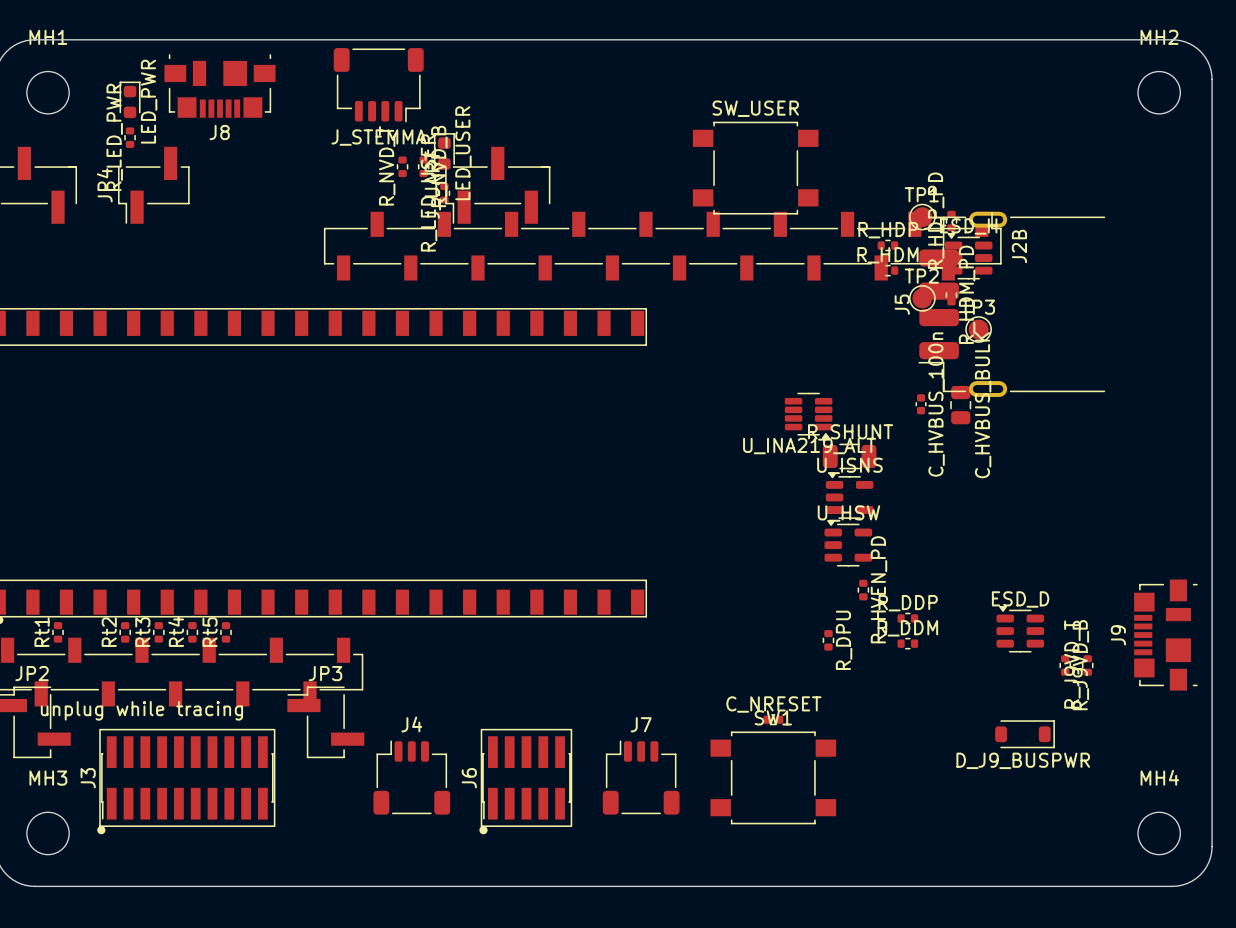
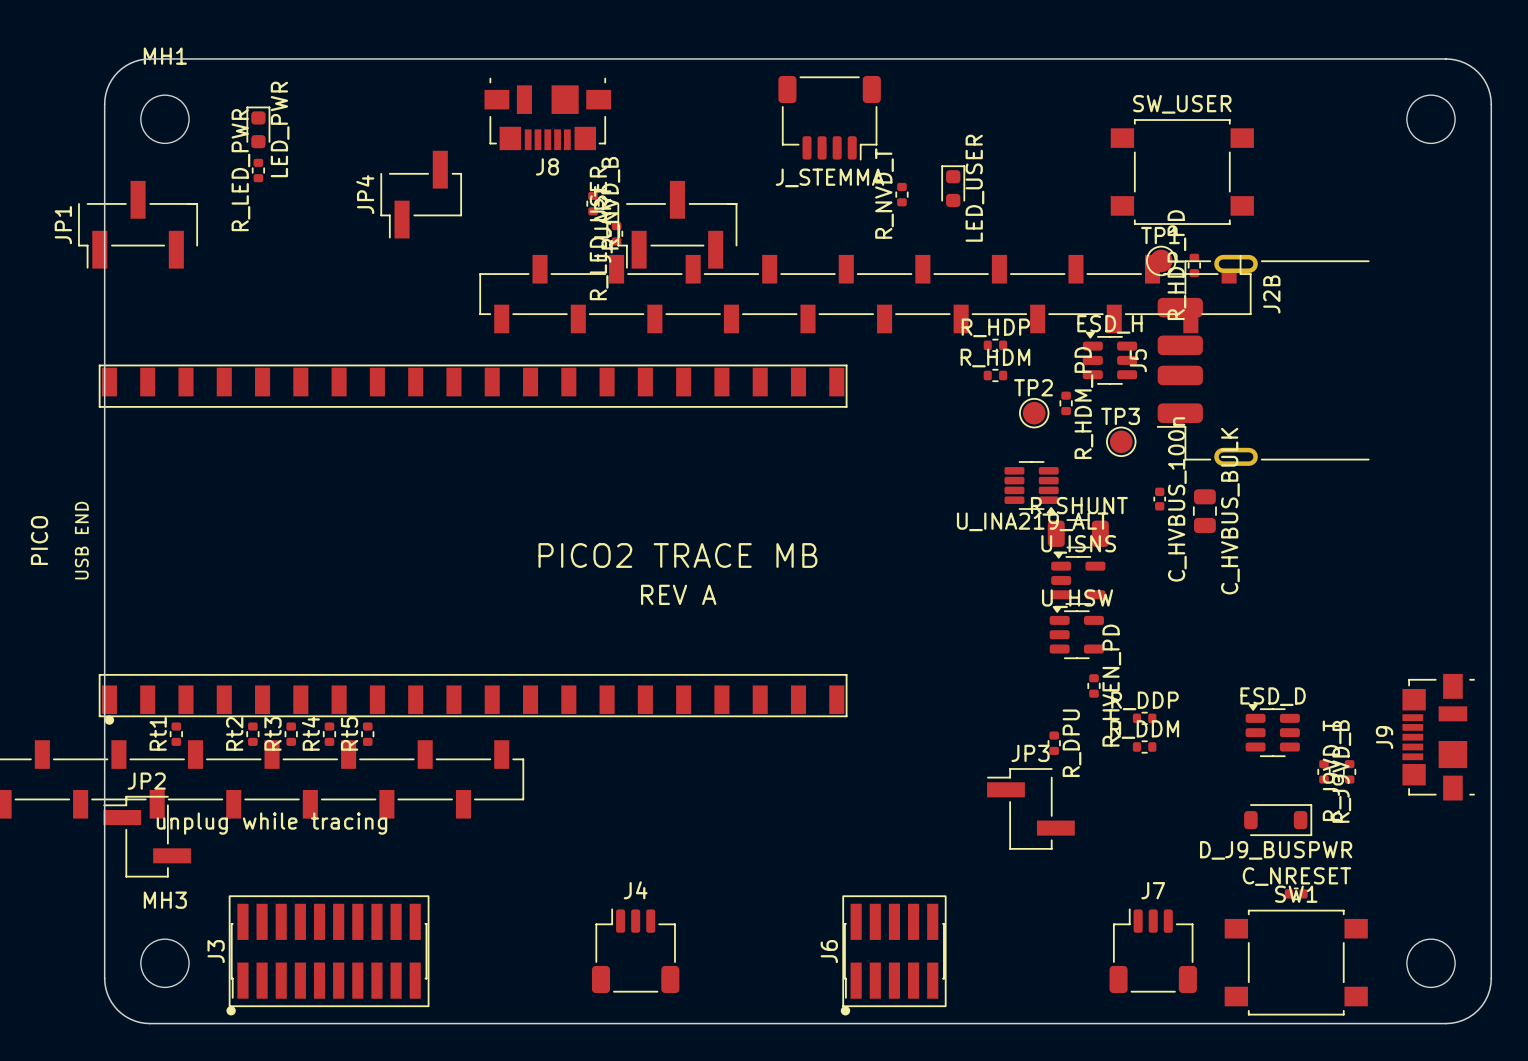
MH2 name: MH2 (1159, 37) -> none
J8 position: (219, 85) -> (547, 113)
J_STEMMA position: (378, 85) -> (829, 118)
LED_USER position: (444, 151) -> (953, 186)
R_NVD_T position: (402, 166) -> (901, 194)
SW_USER position: (755, 168) -> (1182, 172)
JP4 position: (153, 185) -> (421, 194)
R_HDP position: (887, 245) -> (995, 345)
ESD_H position: (968, 256) -> (1109, 358)
R_HDM position: (887, 270) -> (995, 375)
R_HDM_PD position: (951, 295) -> (1066, 403)
TP2 position: (922, 298) -> (1034, 413)
TP3 position: (978, 329) -> (1121, 441)
C_HVBUS_100n position: (921, 404) -> (1159, 499)
C_HVBUS_BULK position: (960, 405) -> (1204, 511)
text: none -> PICO2 TRACE MB (677, 555)
text: none -> REV A (678, 594)
C_NRESET position: (773, 719) -> (1296, 893)
JP3 position: (325, 722) -> (1030, 808)
D_J9_BUSPWR position: (1025, 734) -> (1278, 820)
J4 position: (411, 777) -> (635, 950)
J7 position: (641, 777) -> (1153, 950)
SW1 position: (773, 777) -> (1296, 962)
MH4 name: MH4 (1159, 777) -> none
J3 position: (186, 781) -> (327, 955)
J6 position: (525, 781) -> (893, 955)

